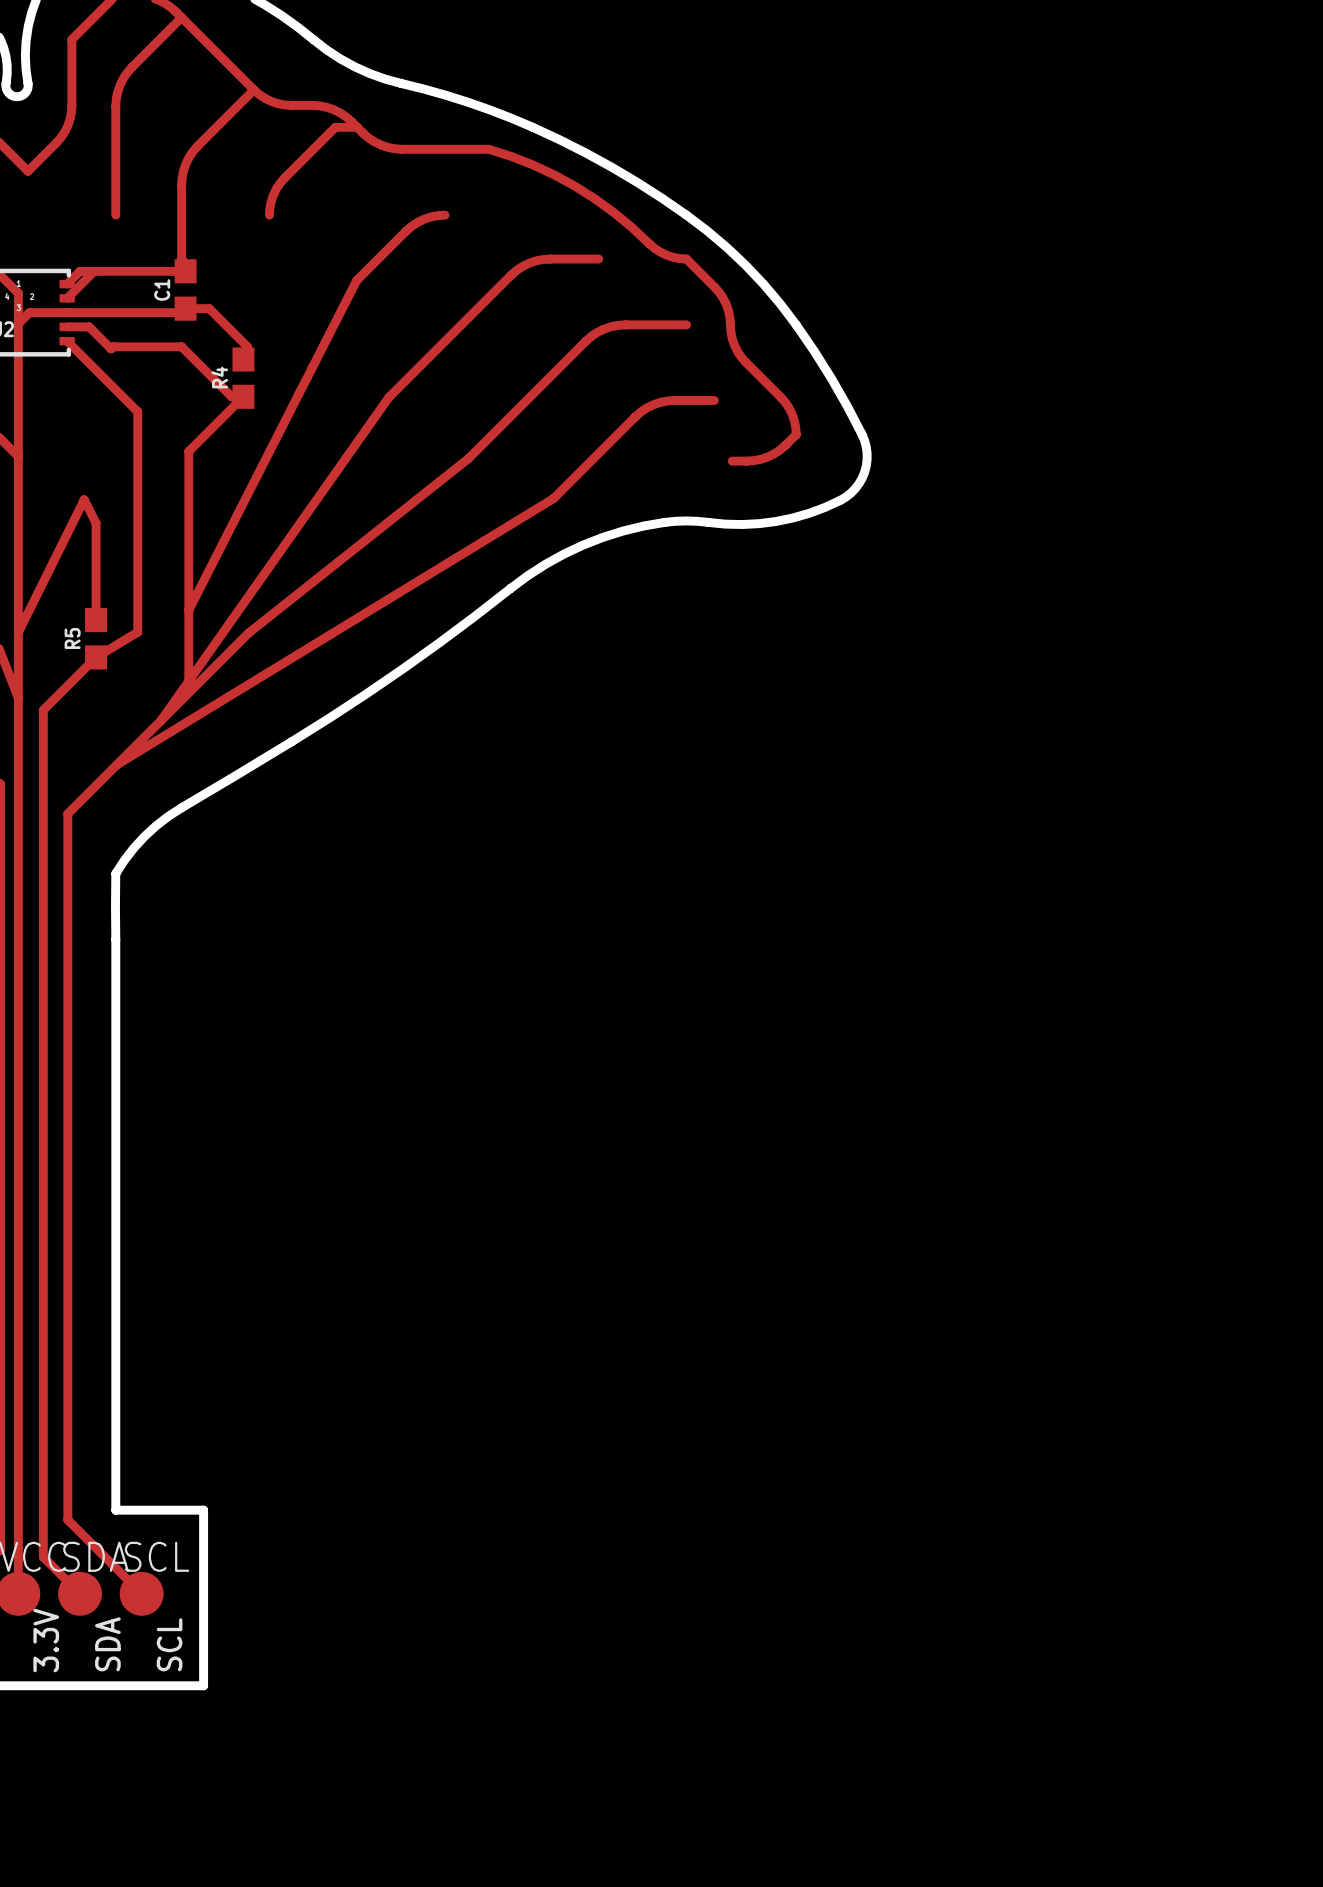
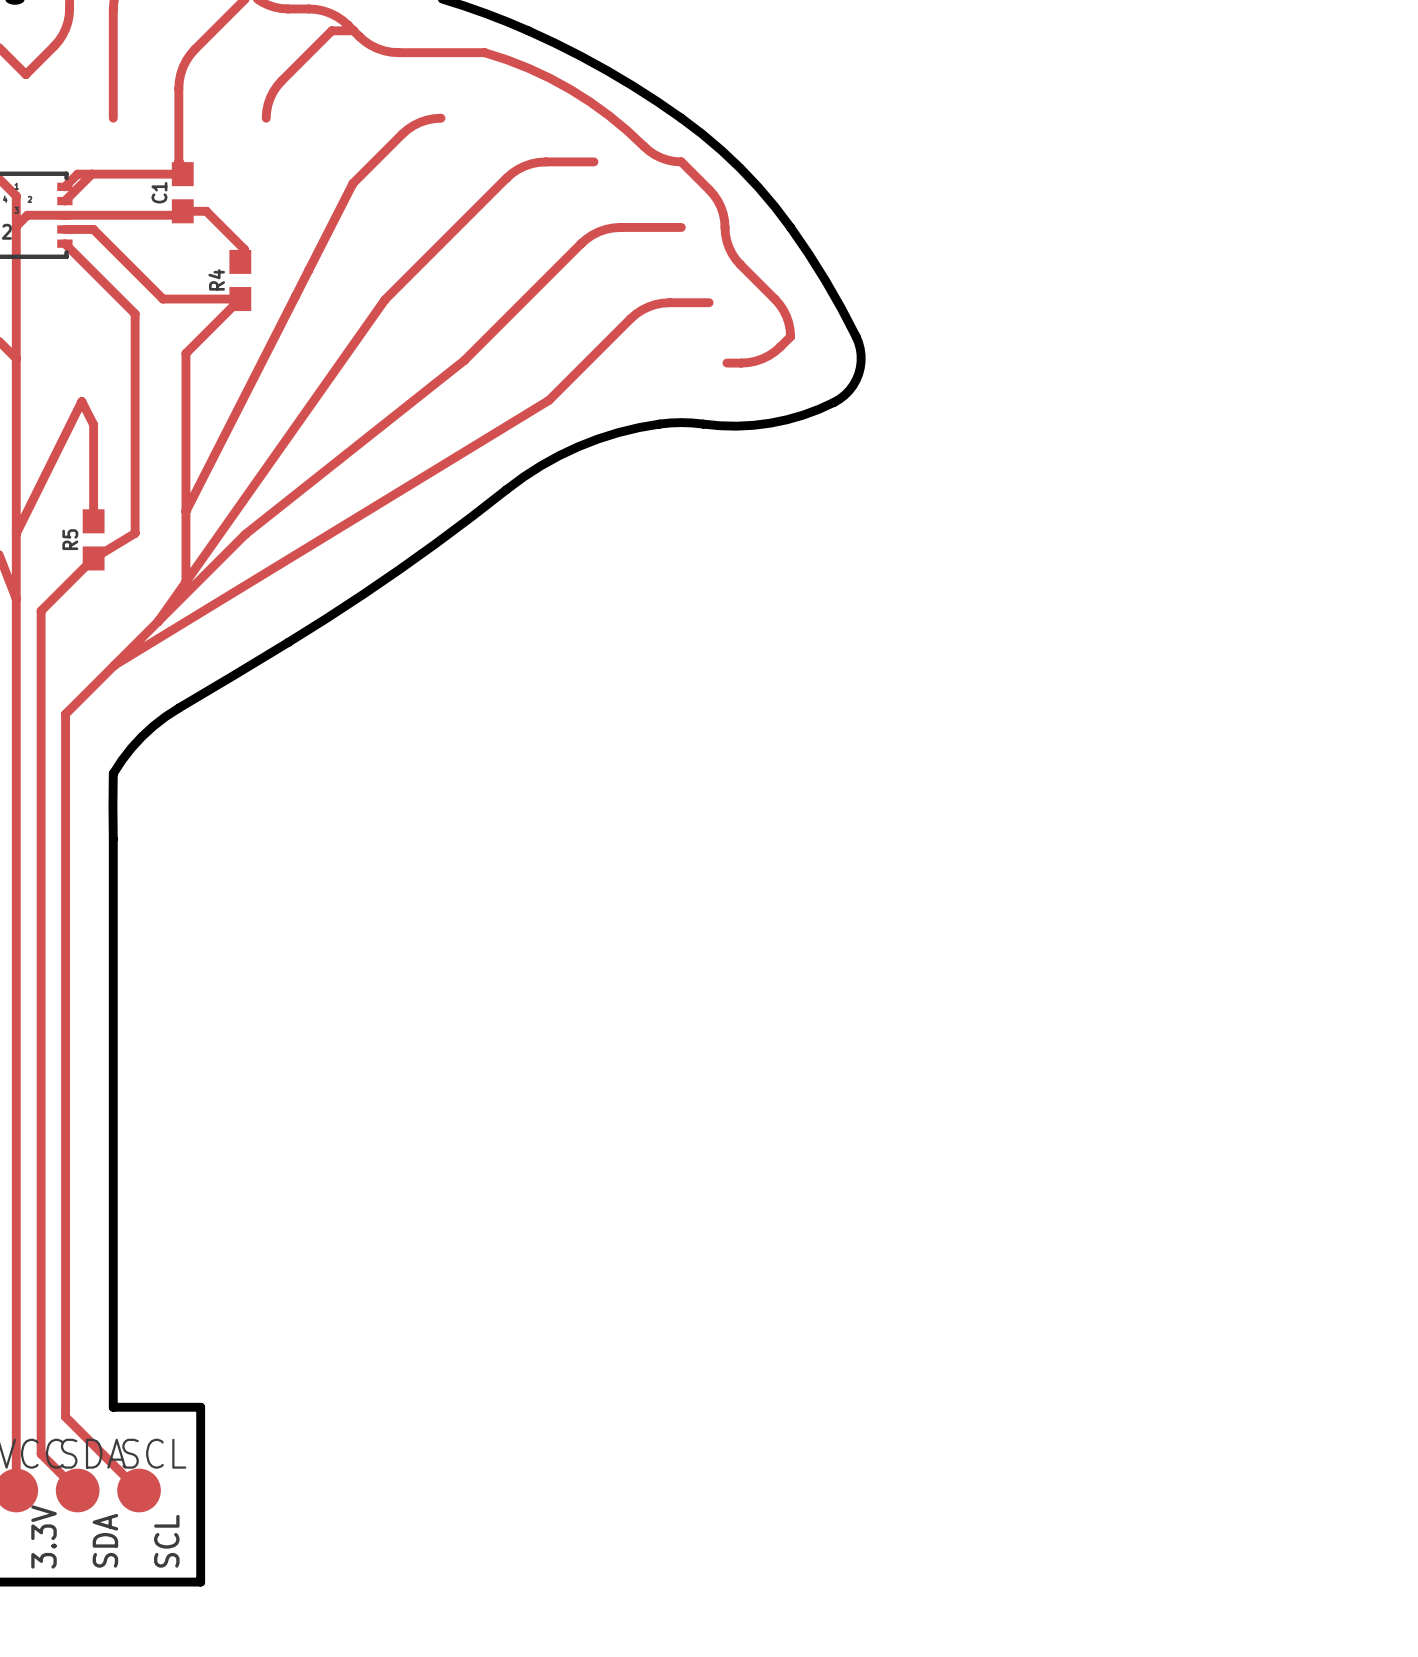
track: (89, 326) (111, 348) (113, 346) (181, 346) (231, 396) -> (86, 229) (93, 229) (163, 299) (228, 299)

